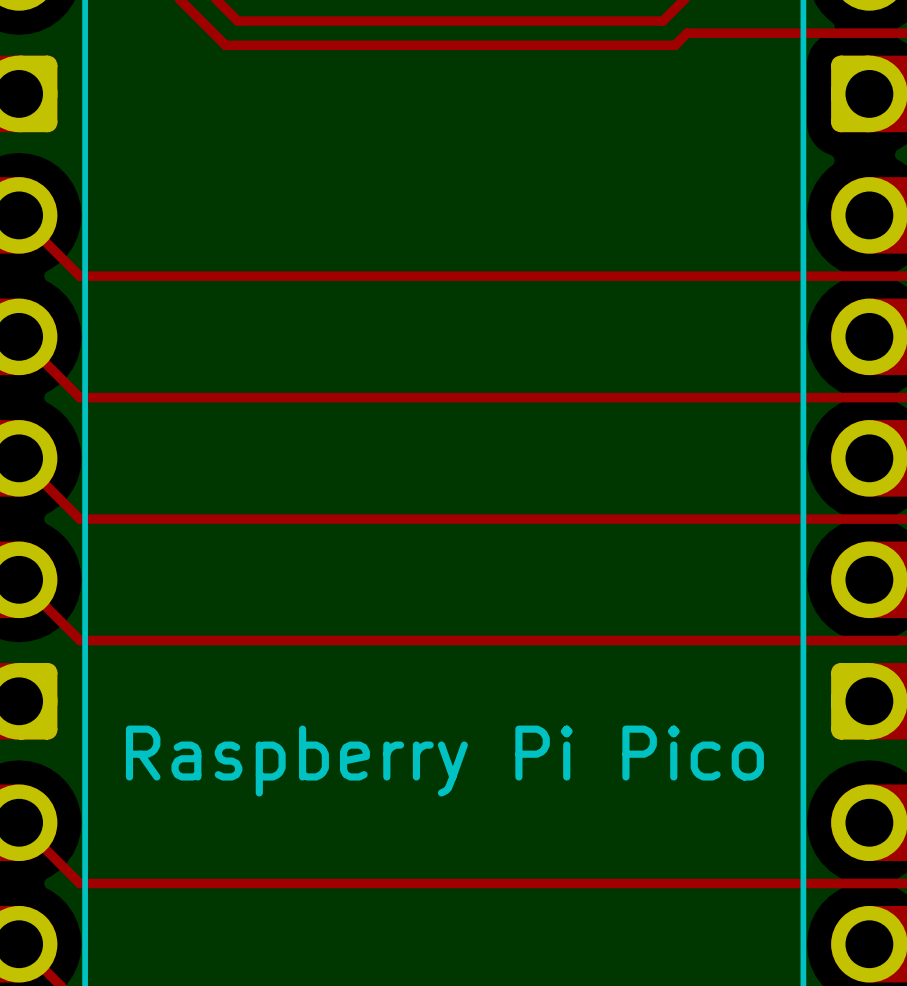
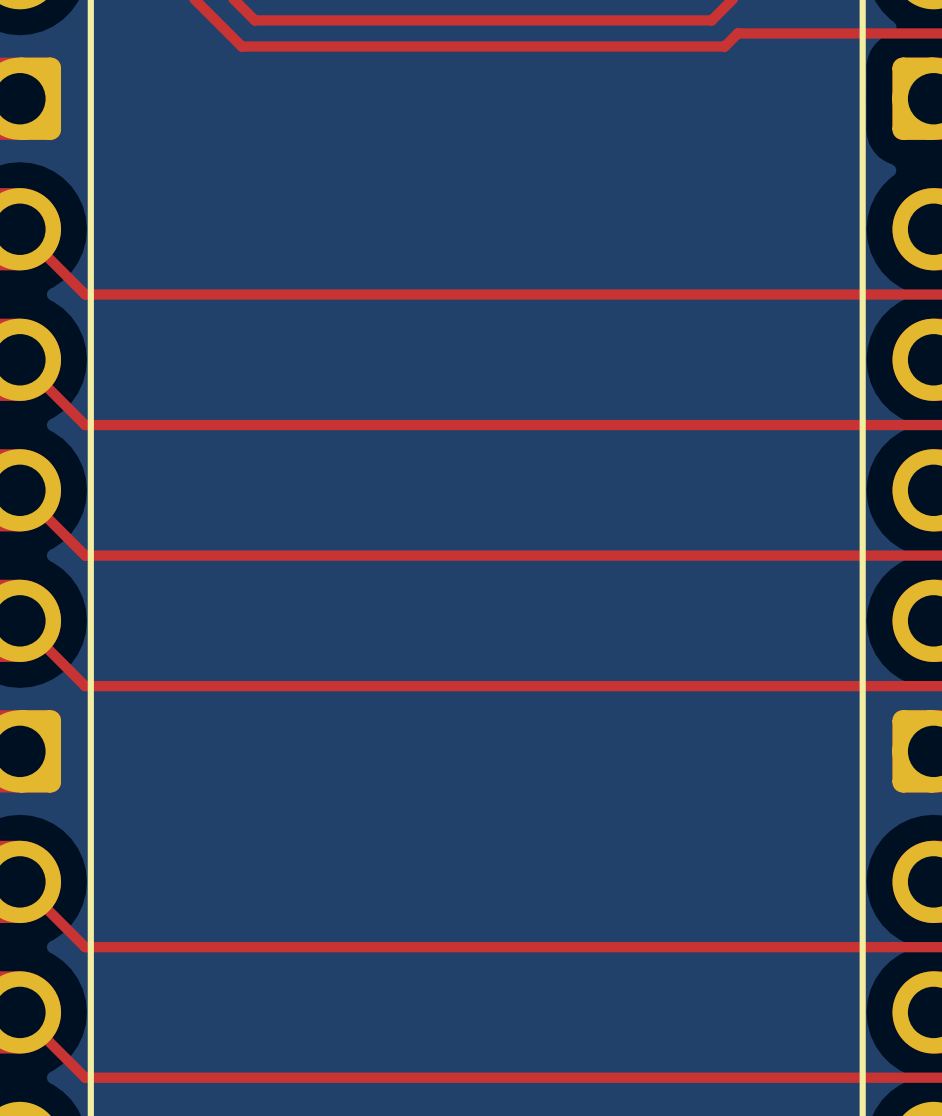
text: Raspberry Pi Pico (444, 761) -> none

